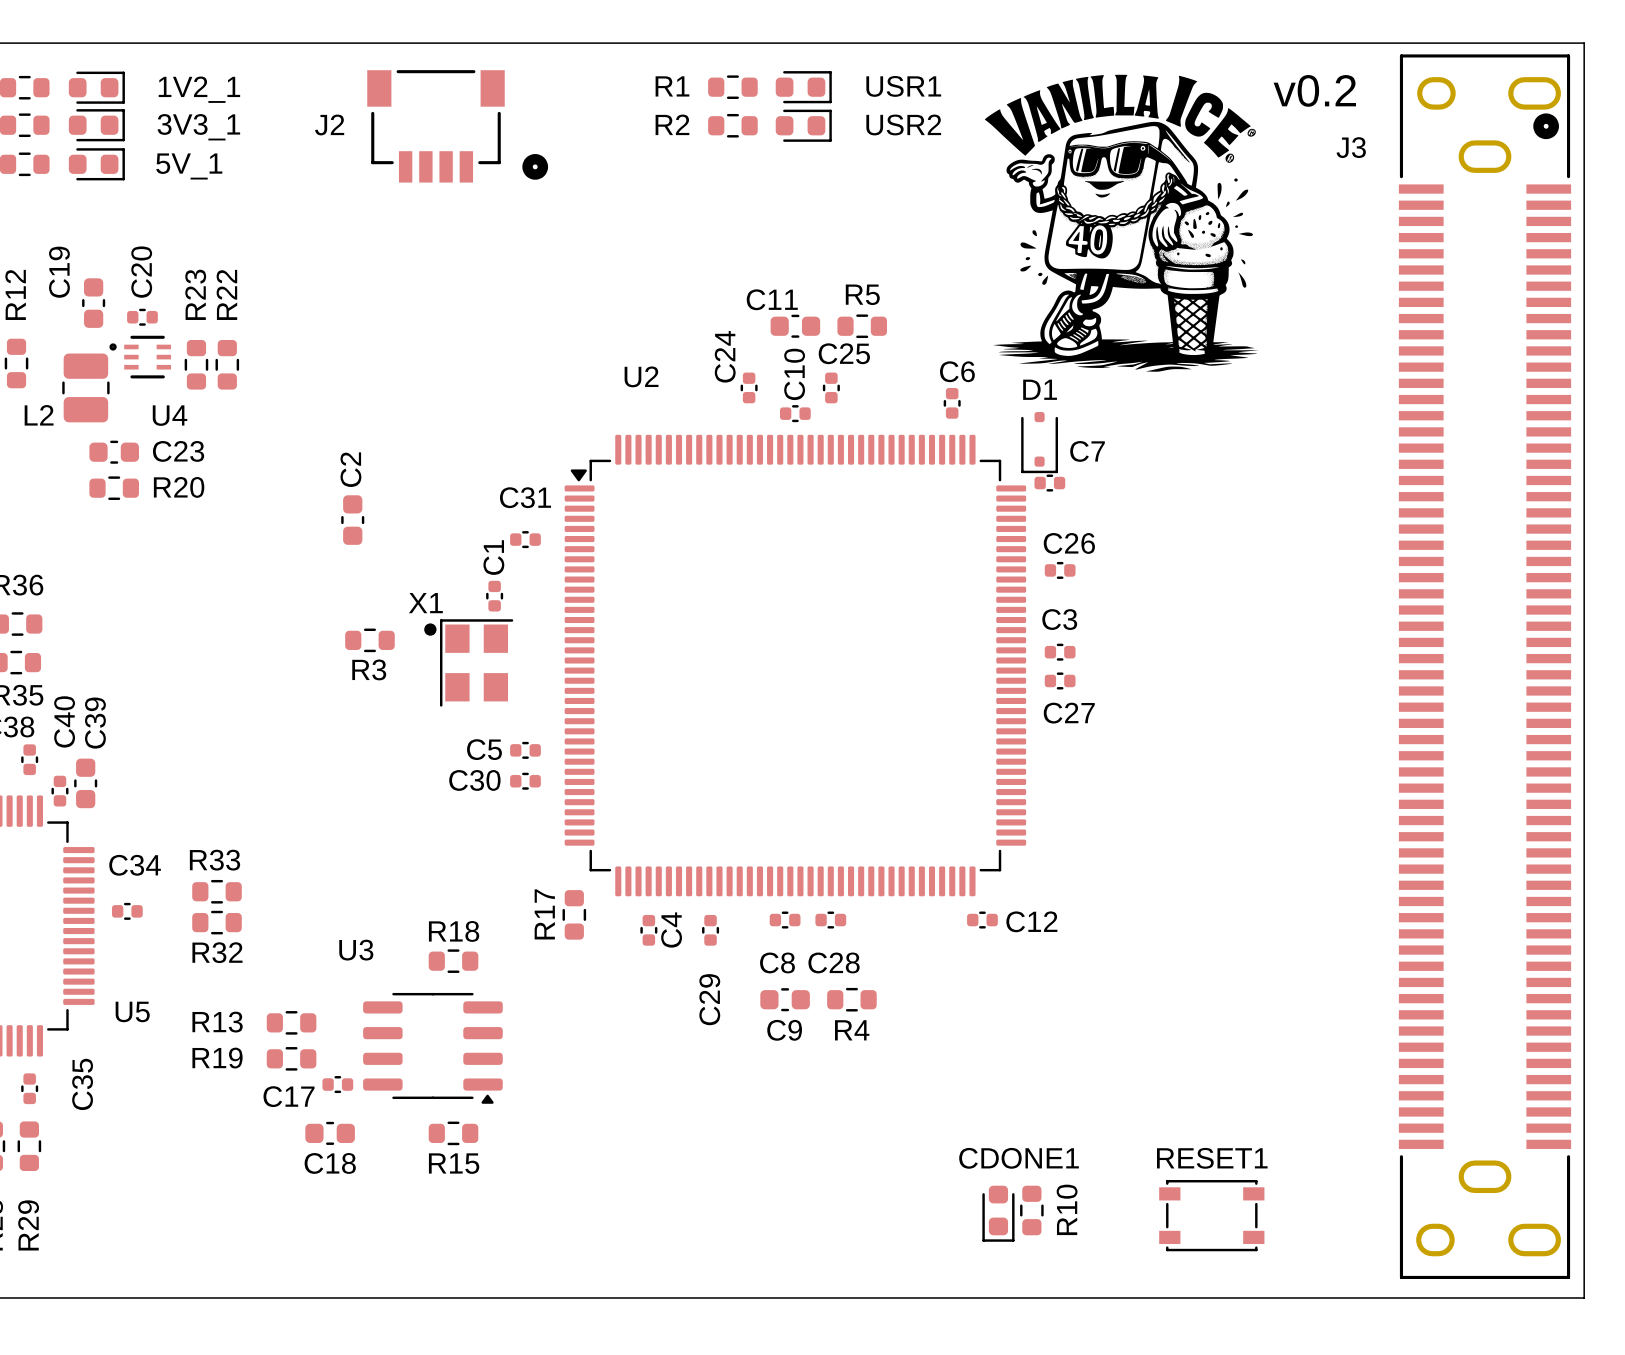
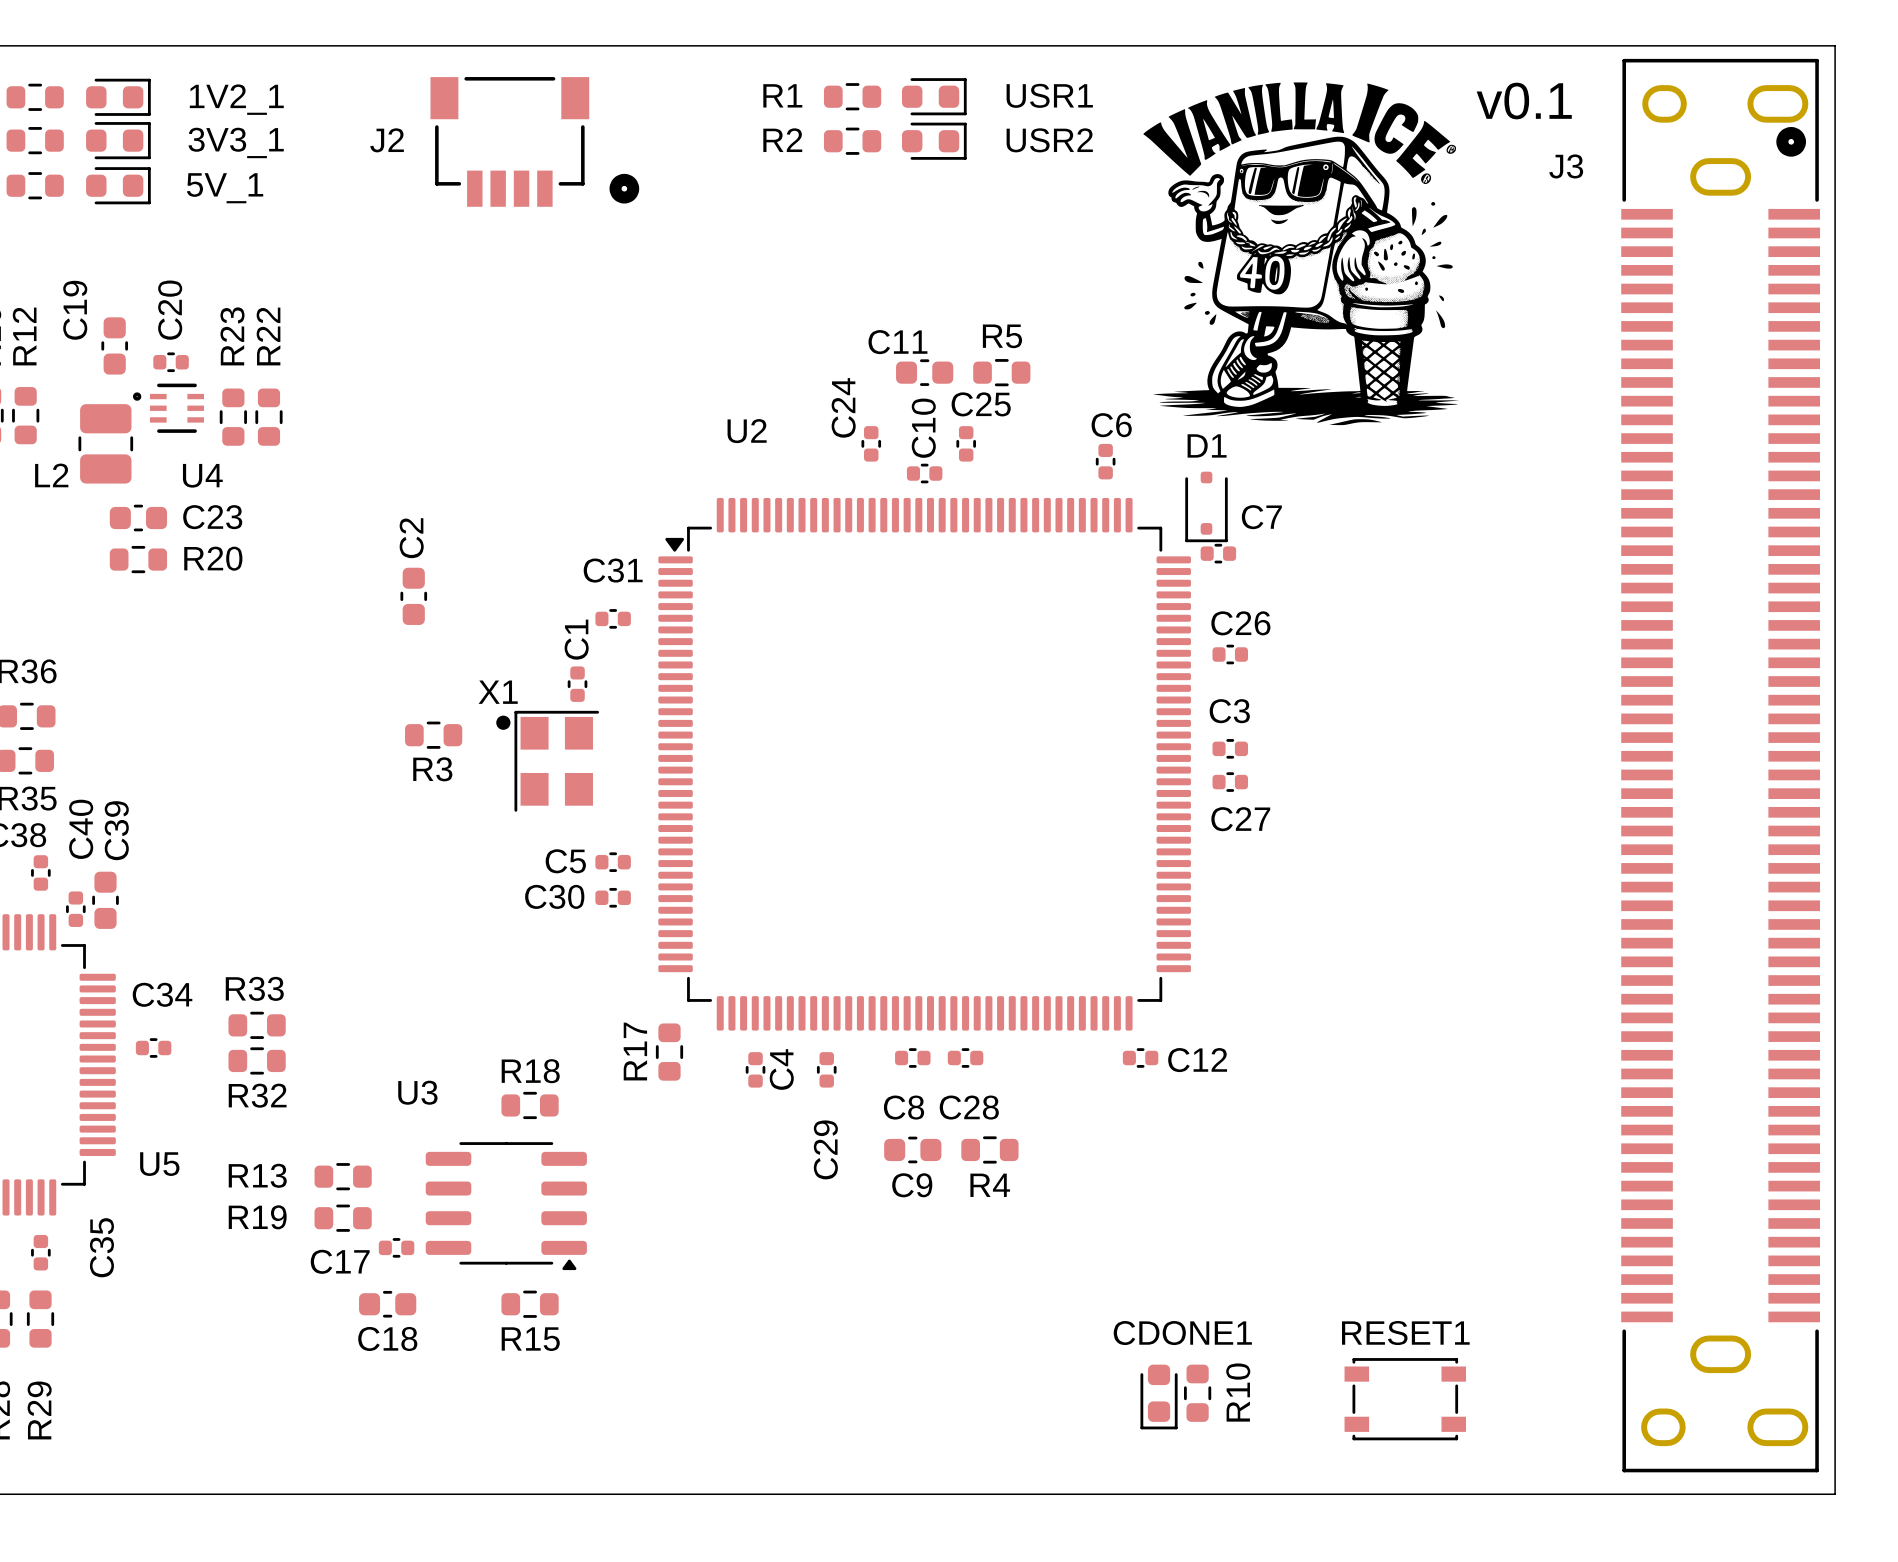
text: v0.2 (1314, 90) -> v0.1 (1524, 101)

